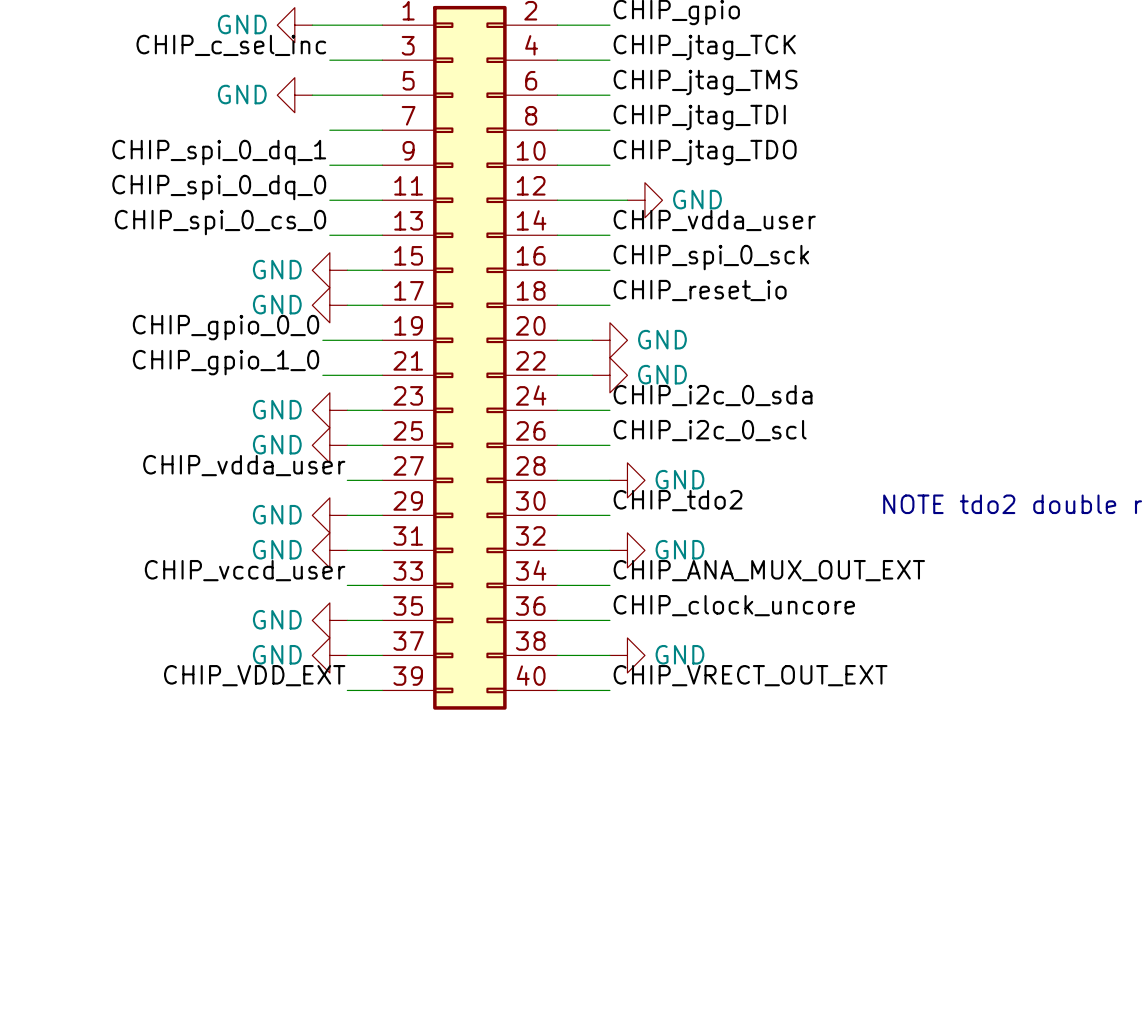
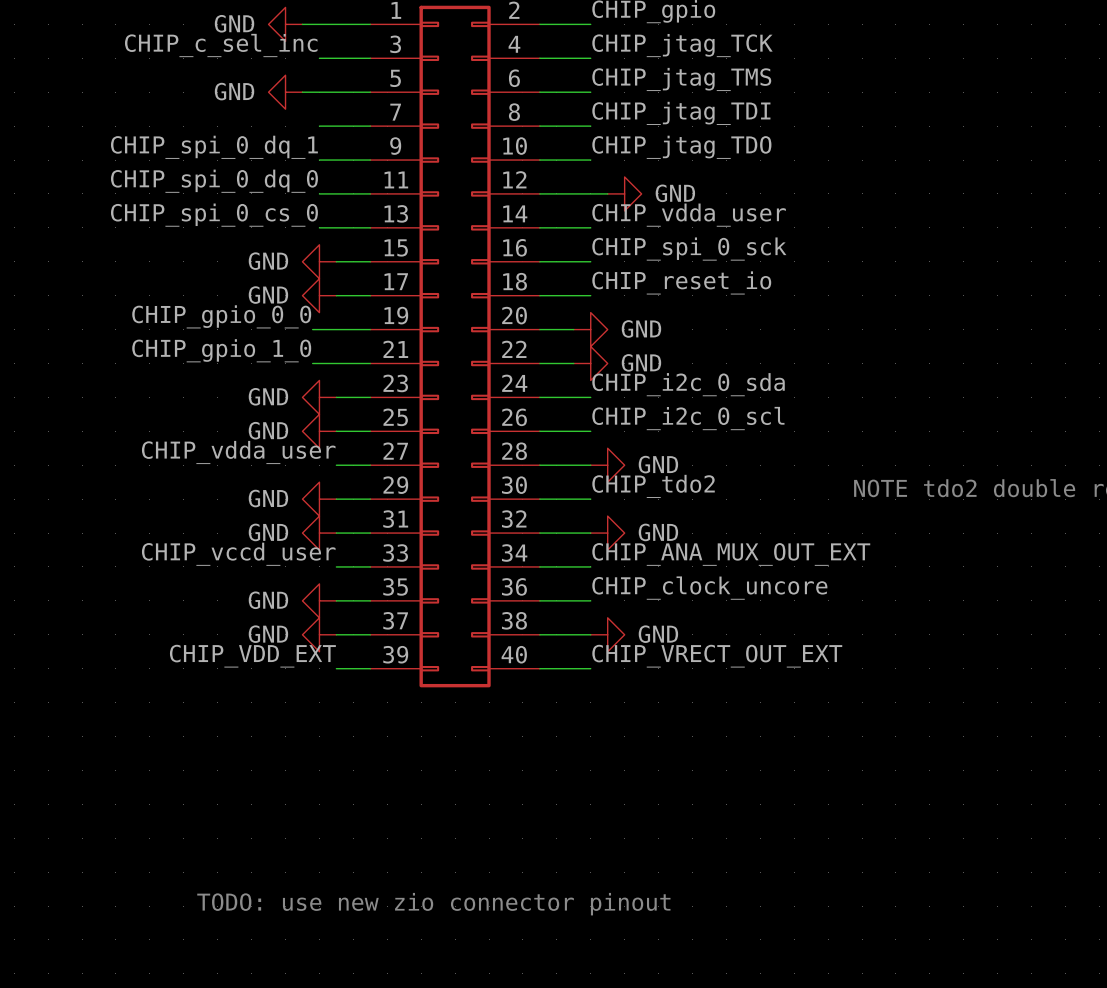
text: none -> TODO: use new zio connector pinout (433, 904)

